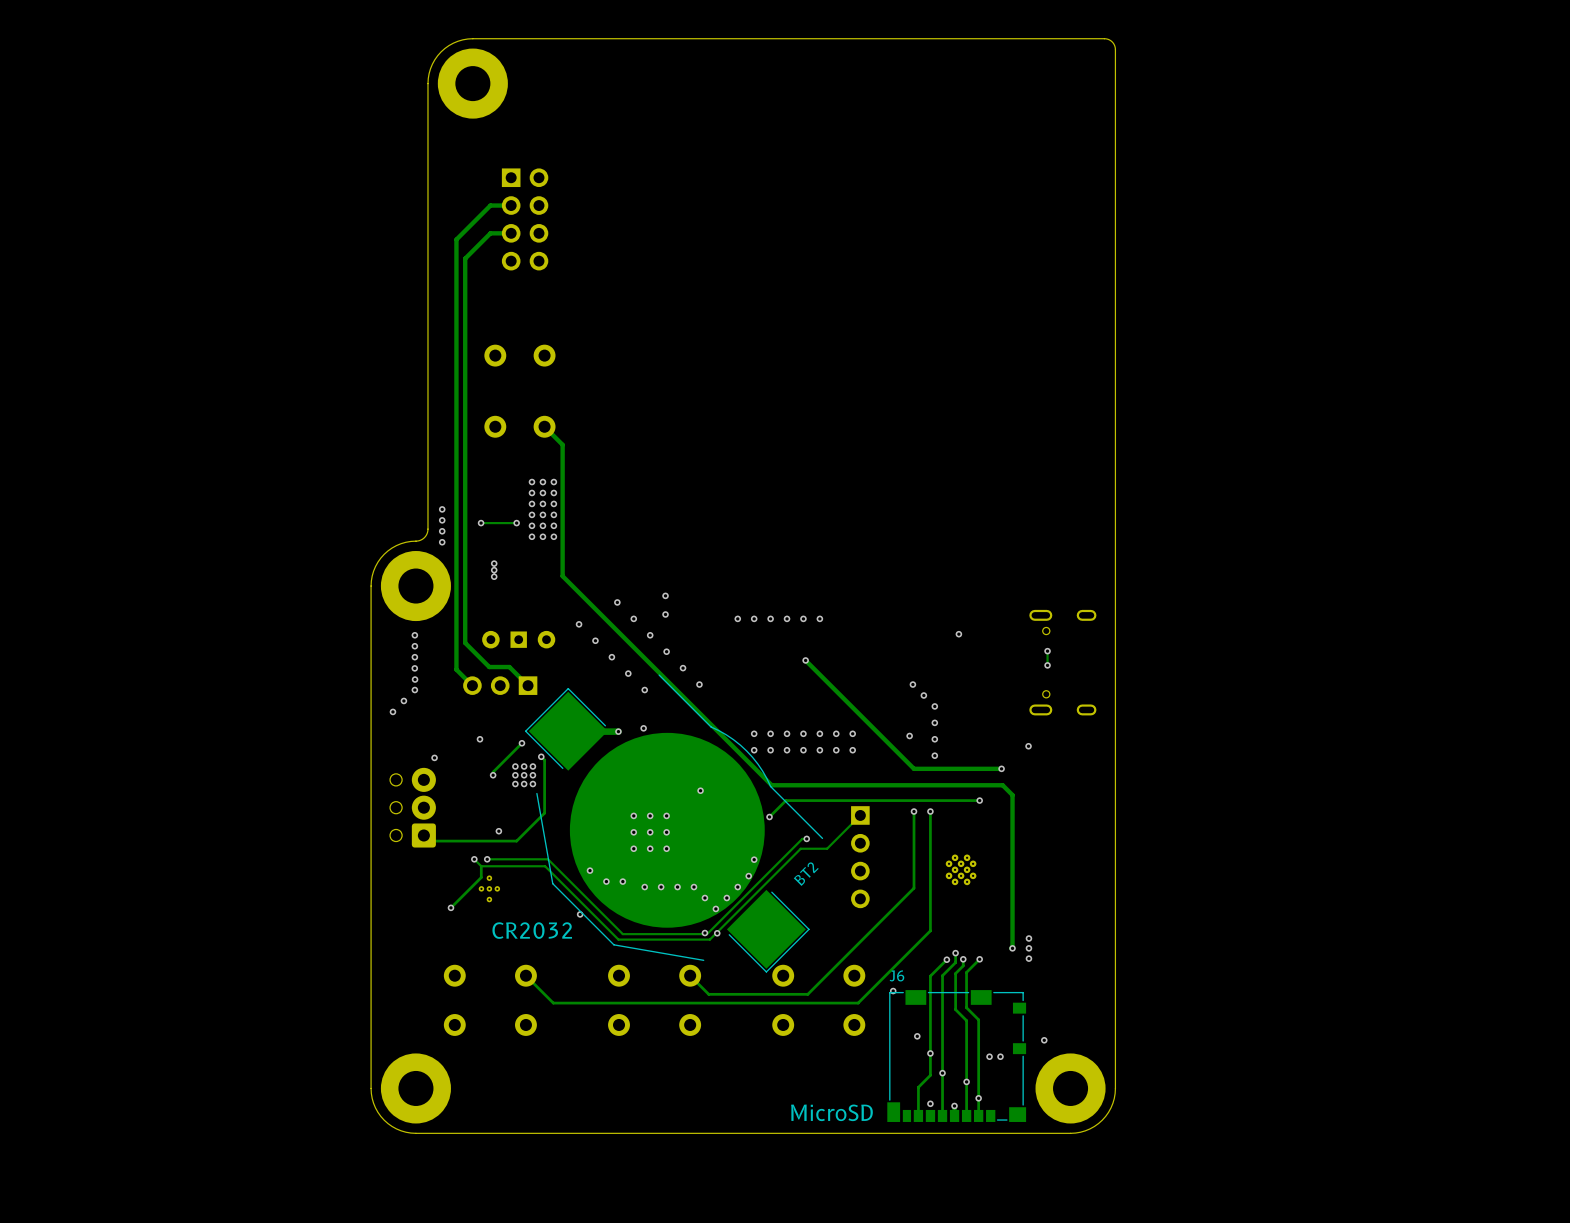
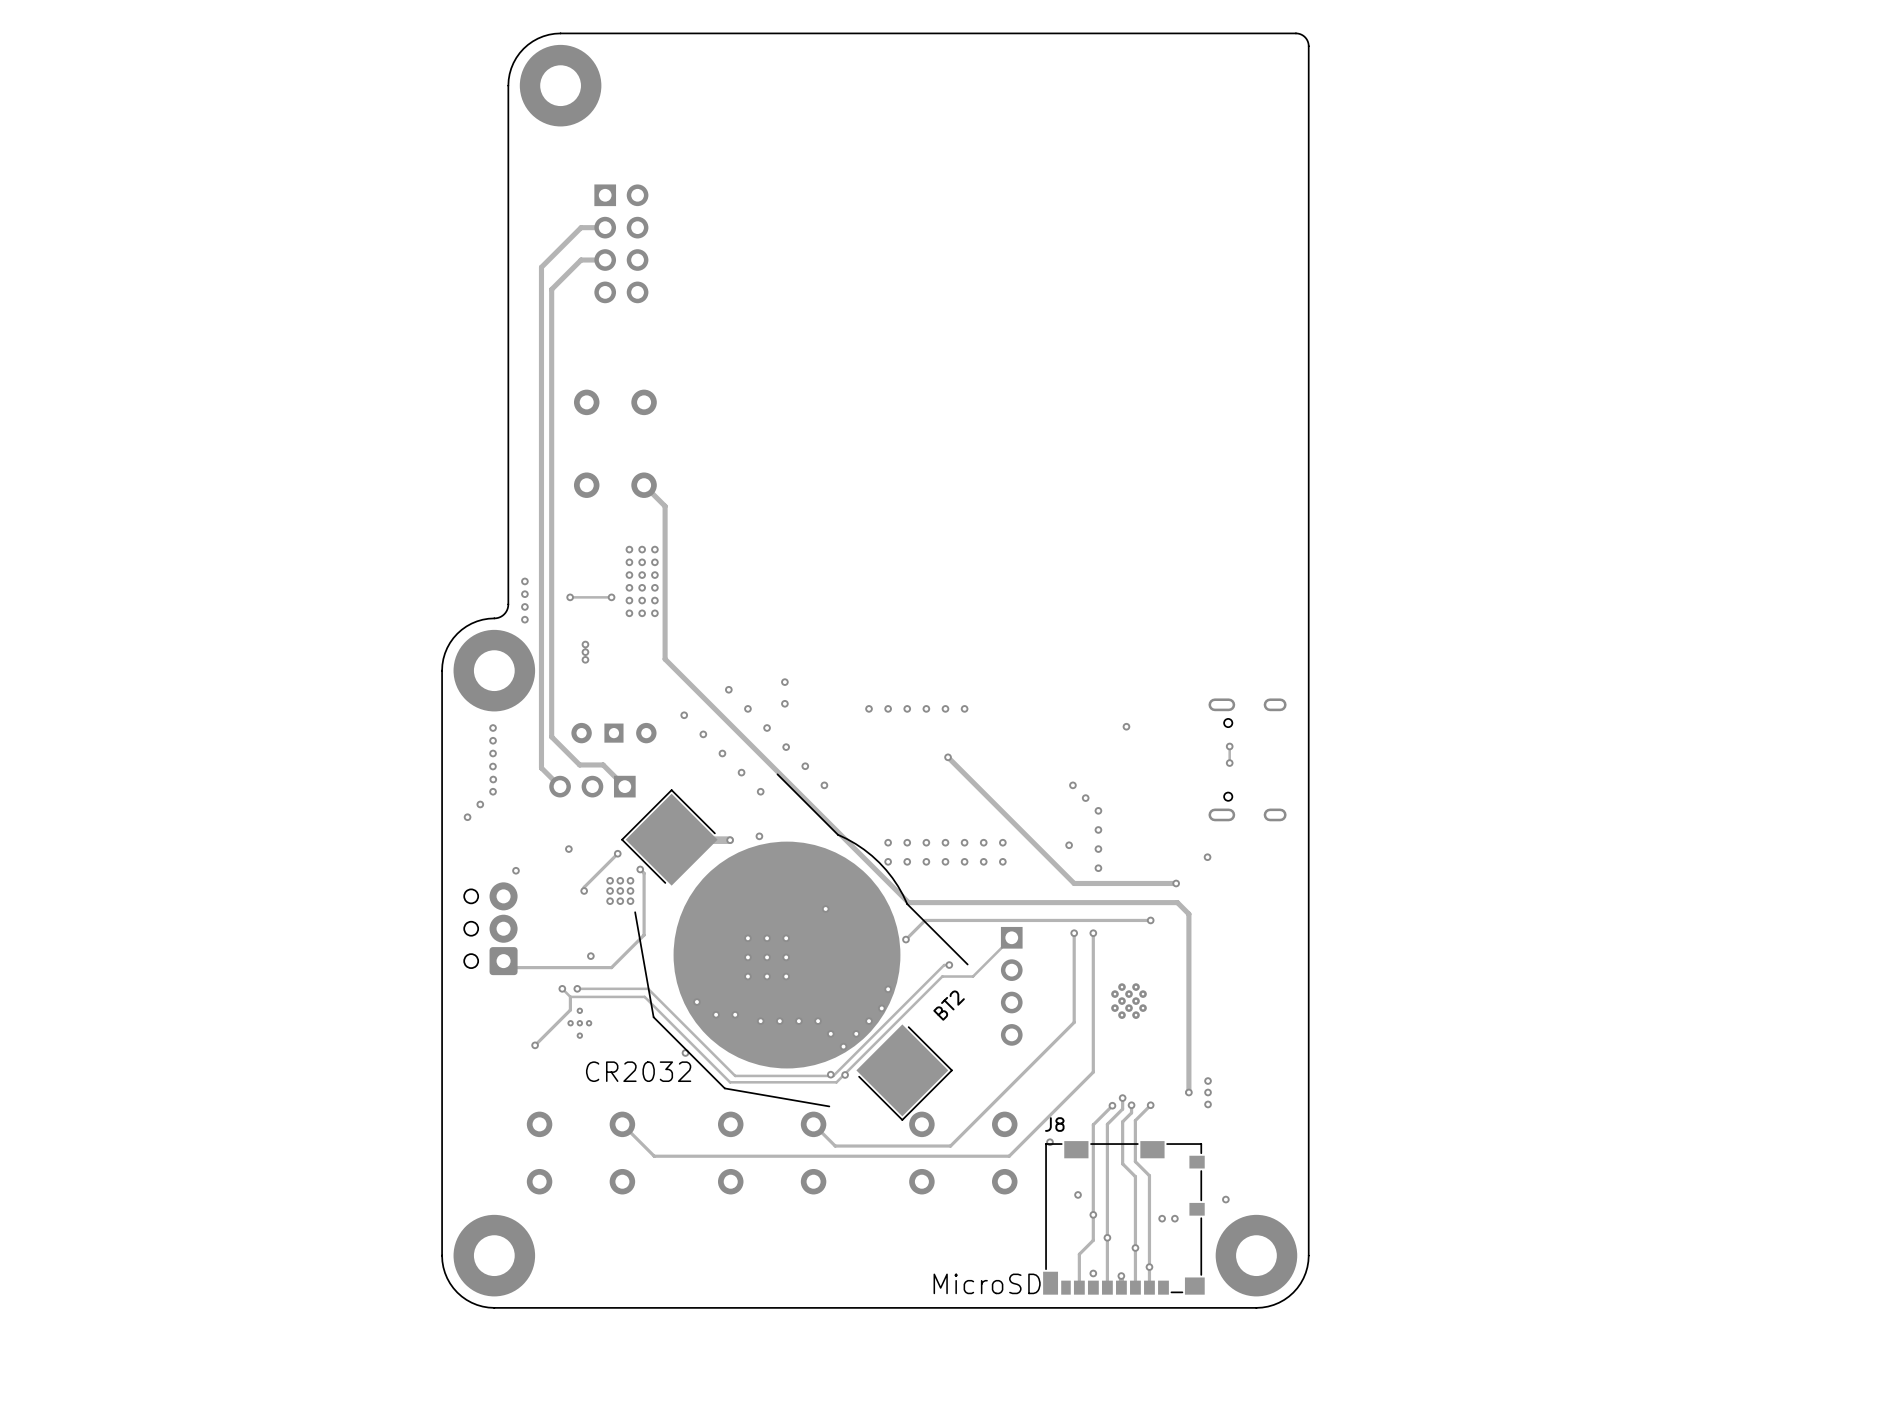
J6 name: J6 (896, 975) -> J8 (1054, 1124)

